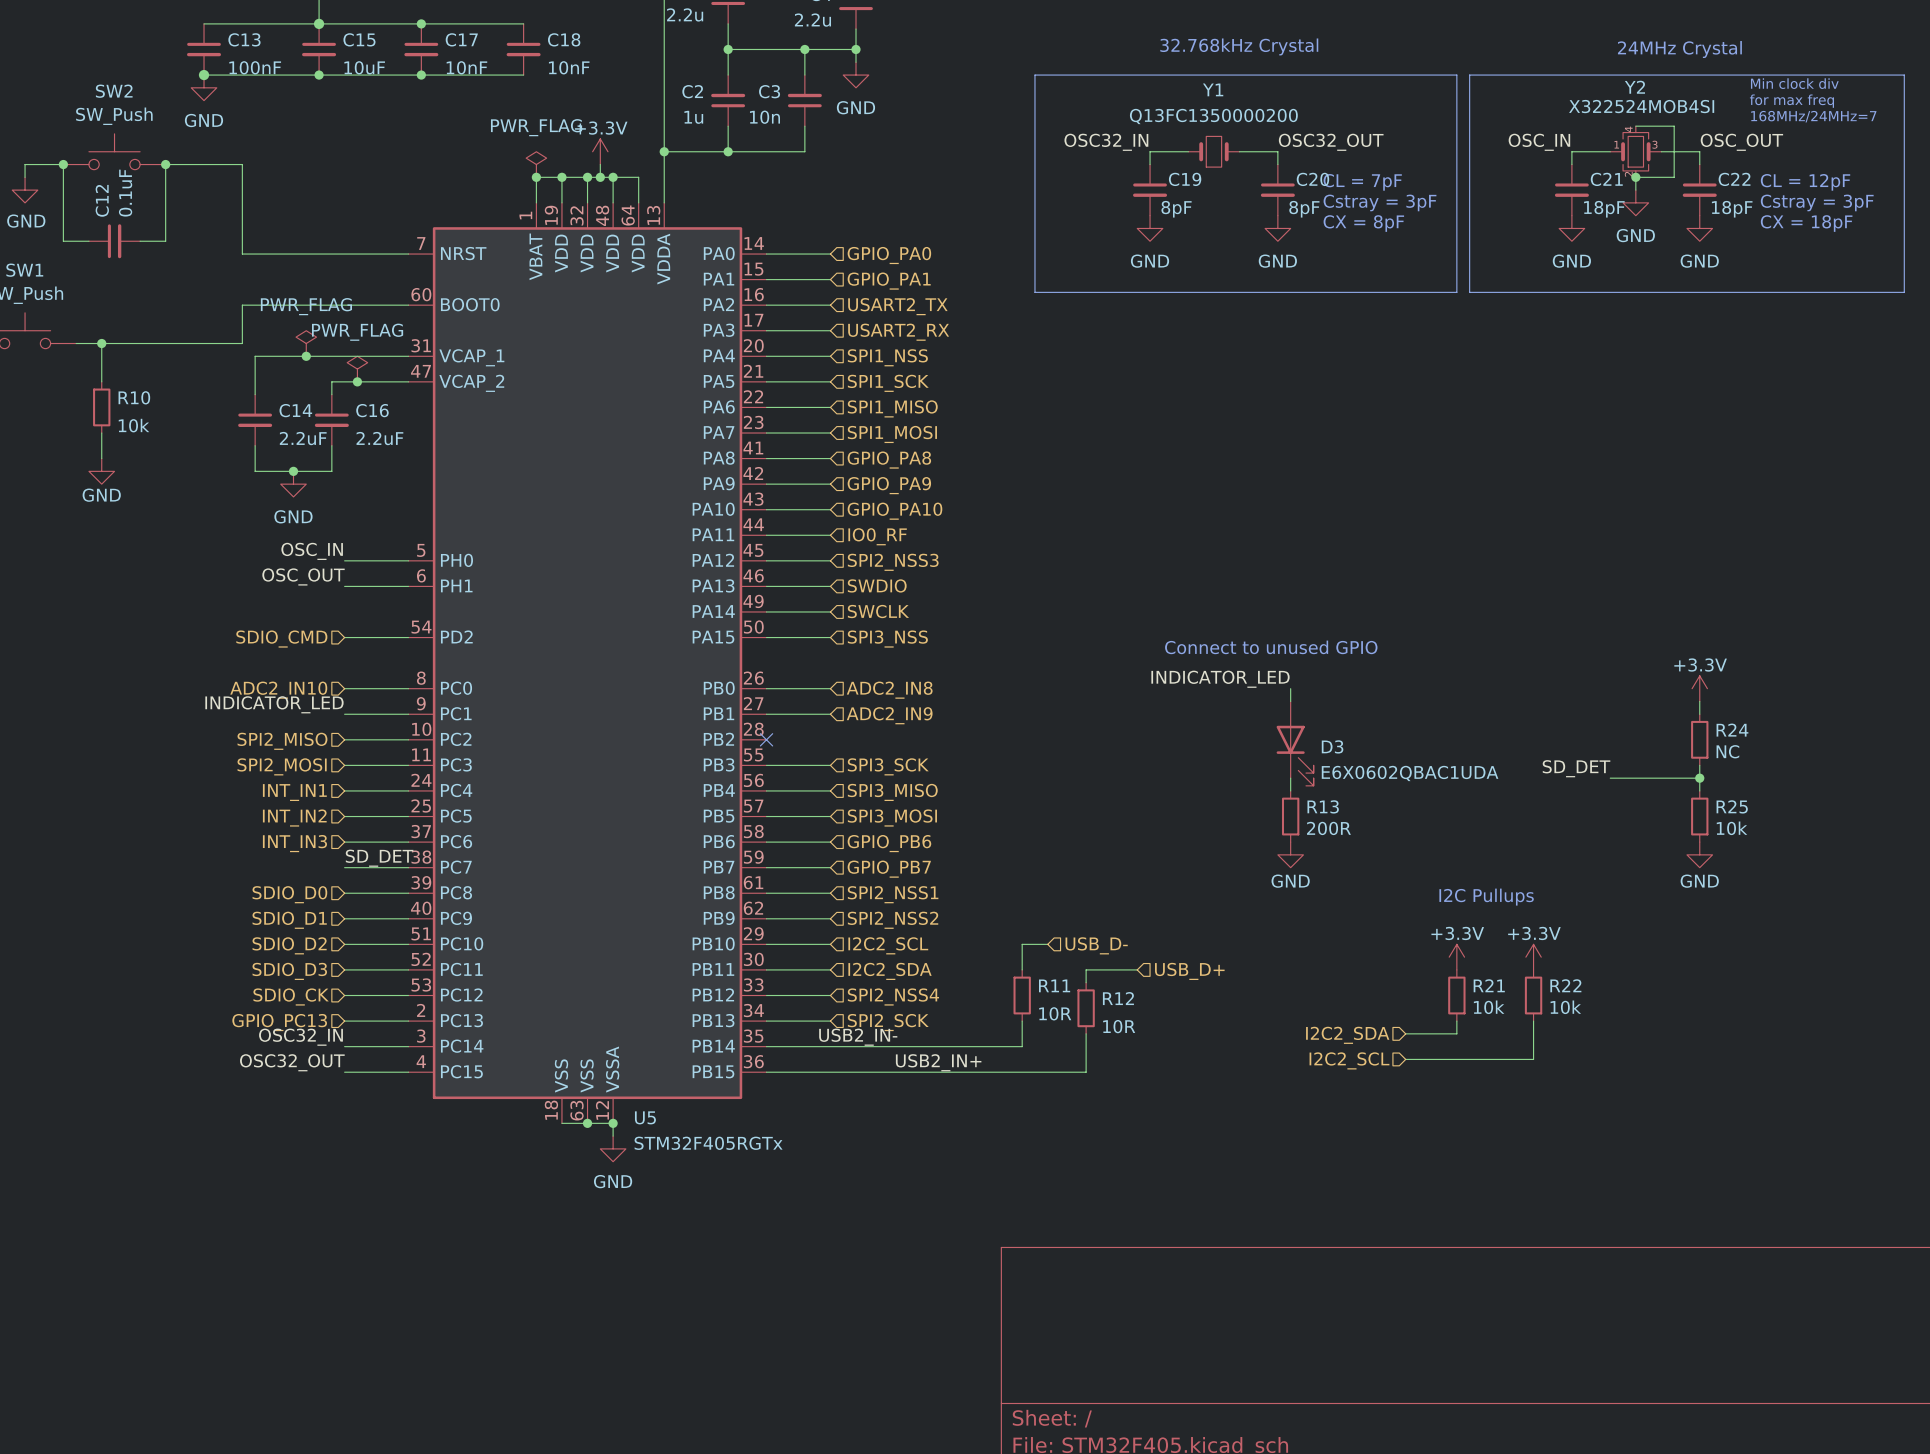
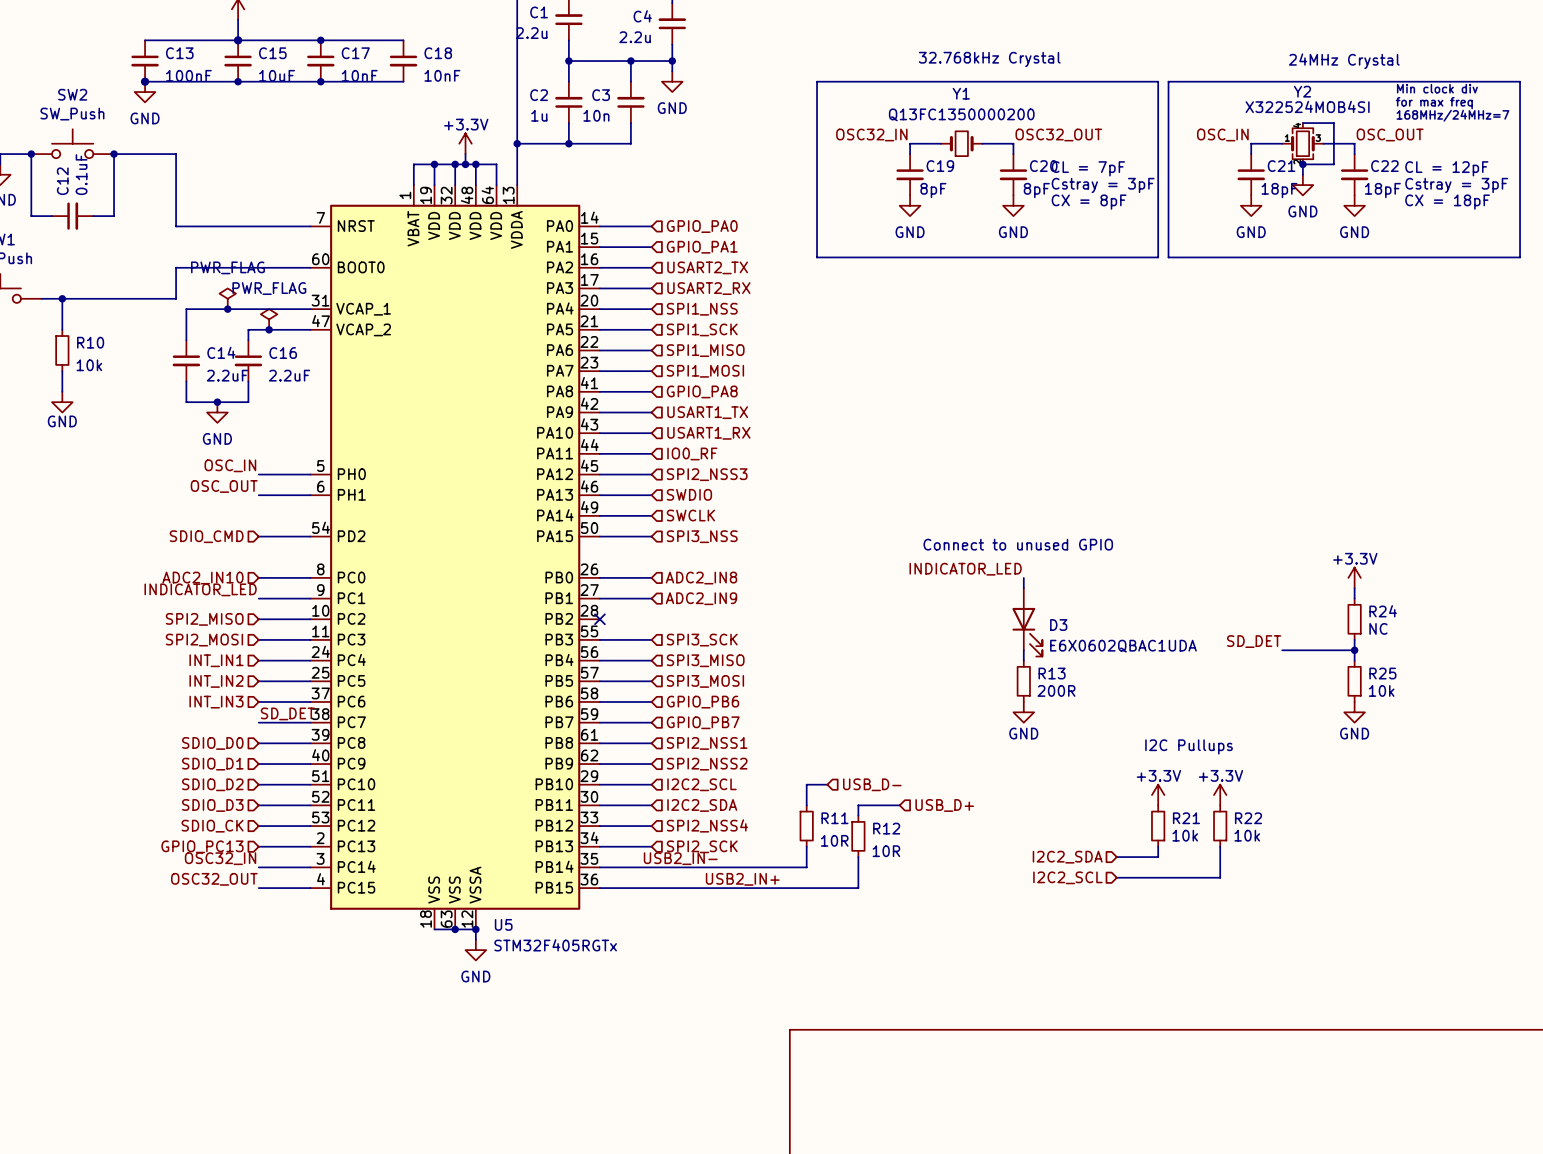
power symbol: PWR_FLAG (536, 164) -> none
junction: (536, 177) -> none
hierarchical label: GPIO_PA9 (889, 485) -> USART1_TX (707, 412)
hierarchical label: GPIO_PA10 (894, 511) -> USART1_RX (708, 433)

